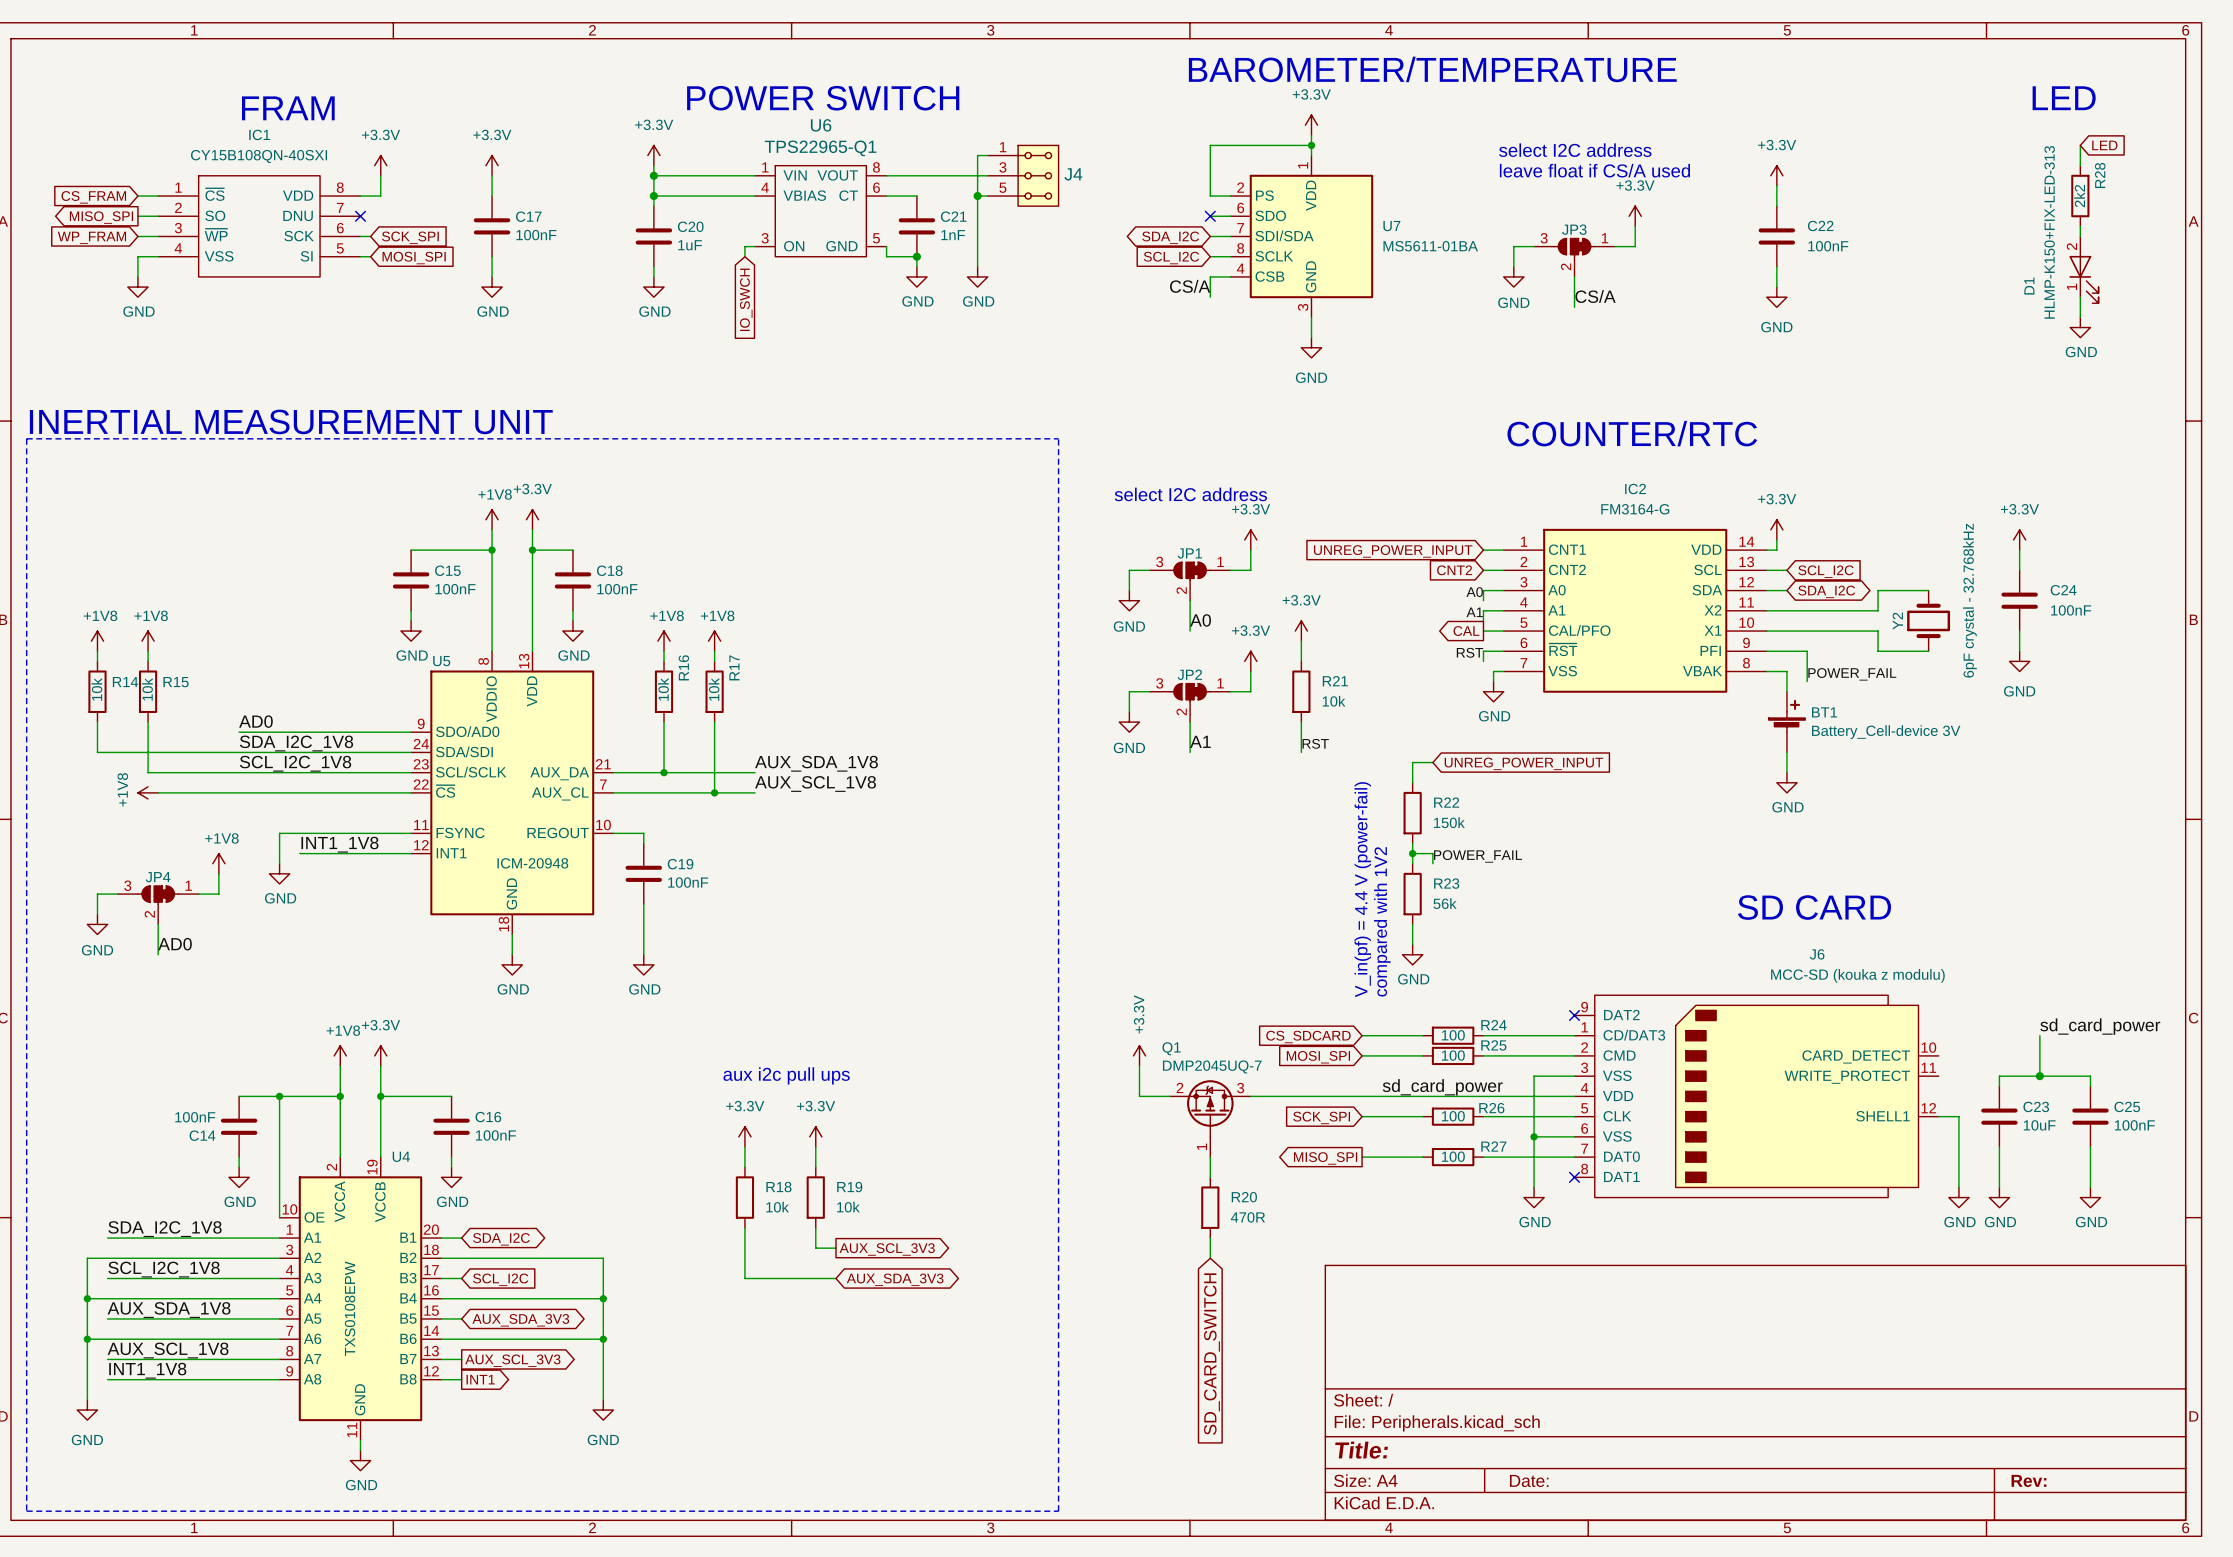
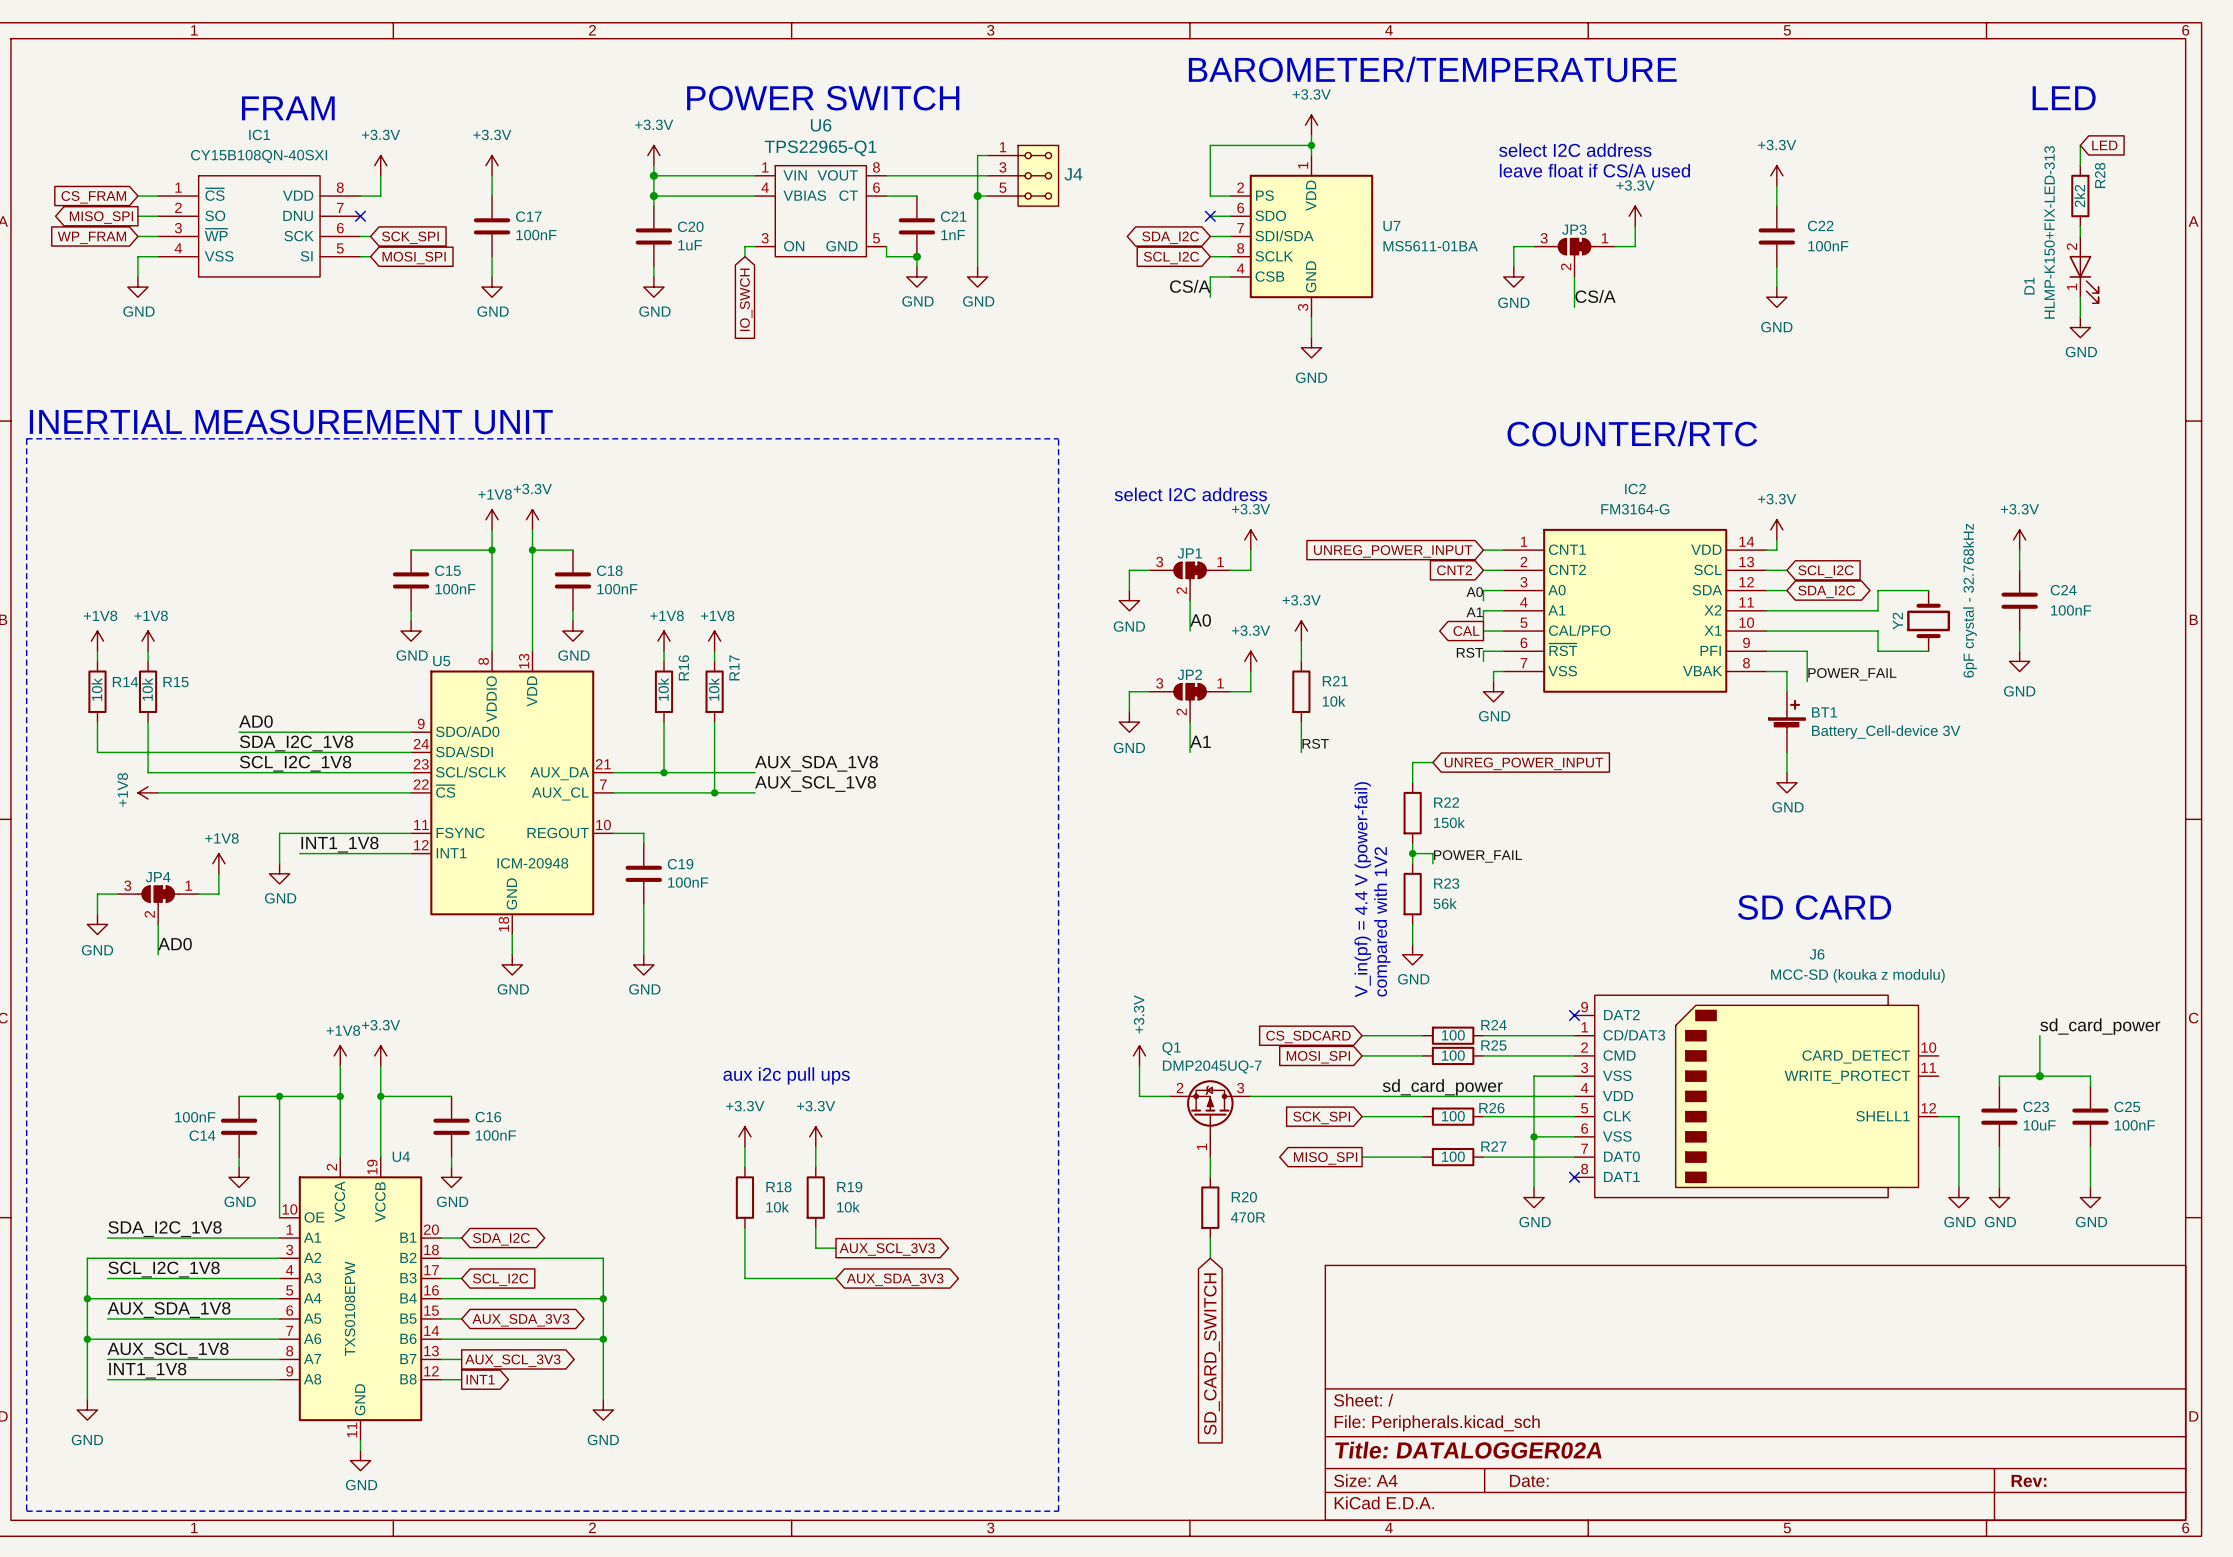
title block: Title: (1361, 1450) -> Title: DATALOGGER02A (1468, 1450)

